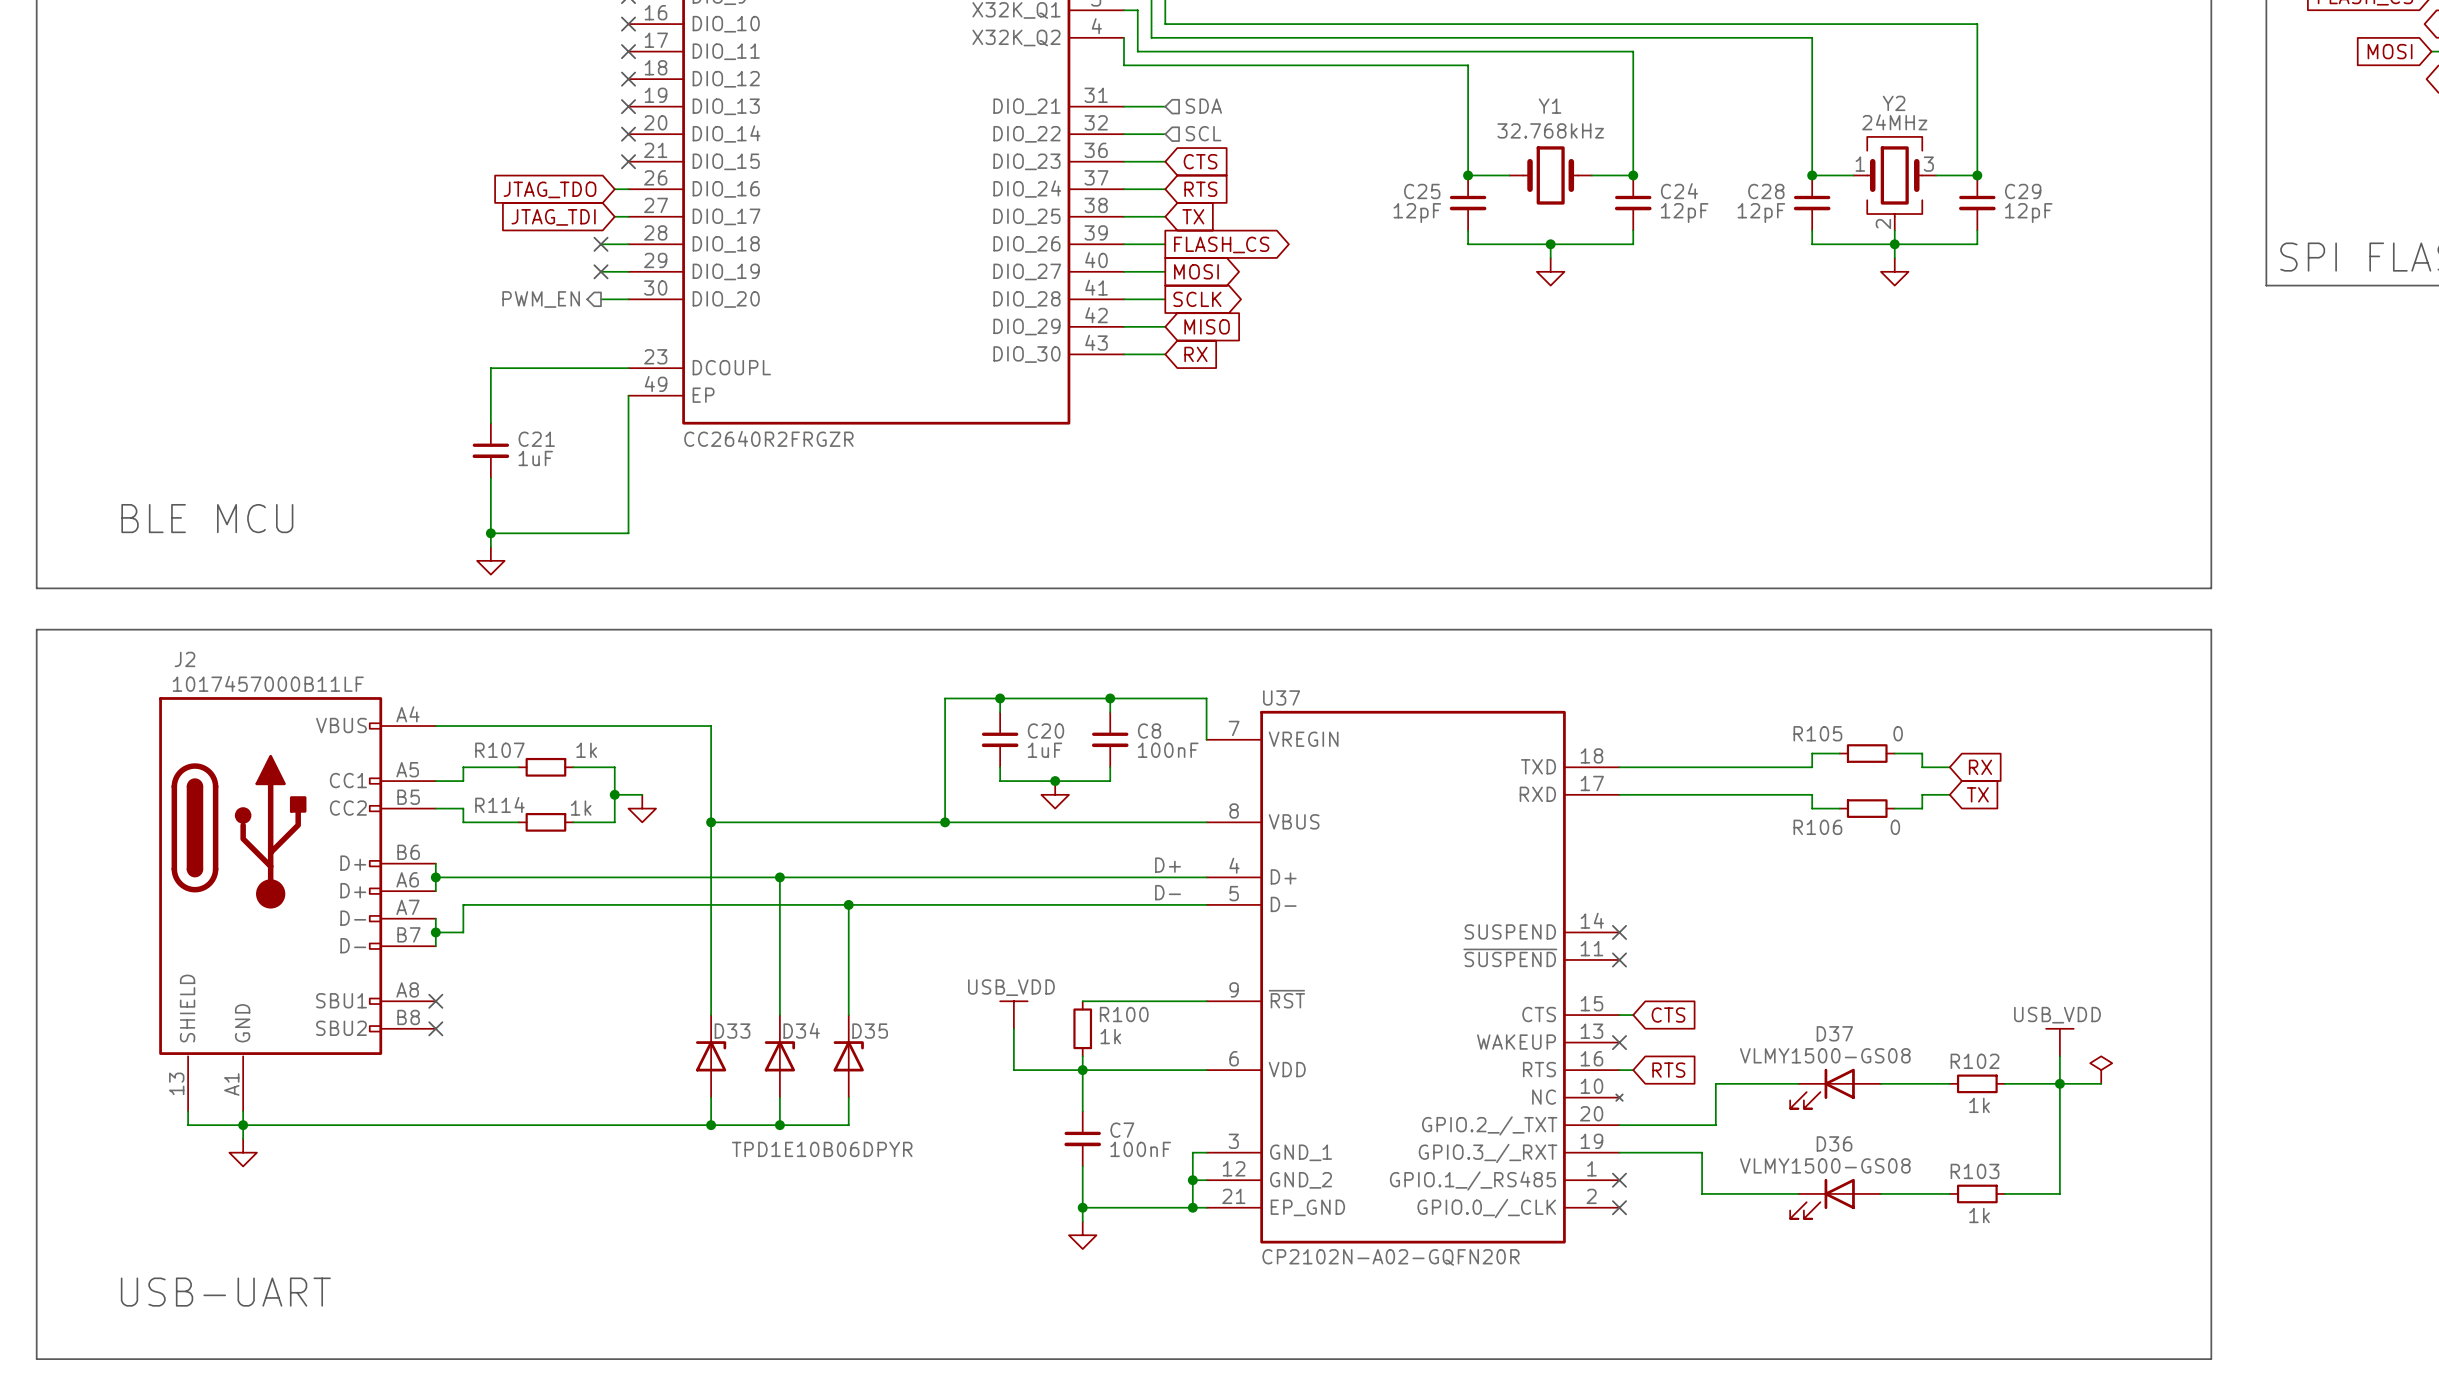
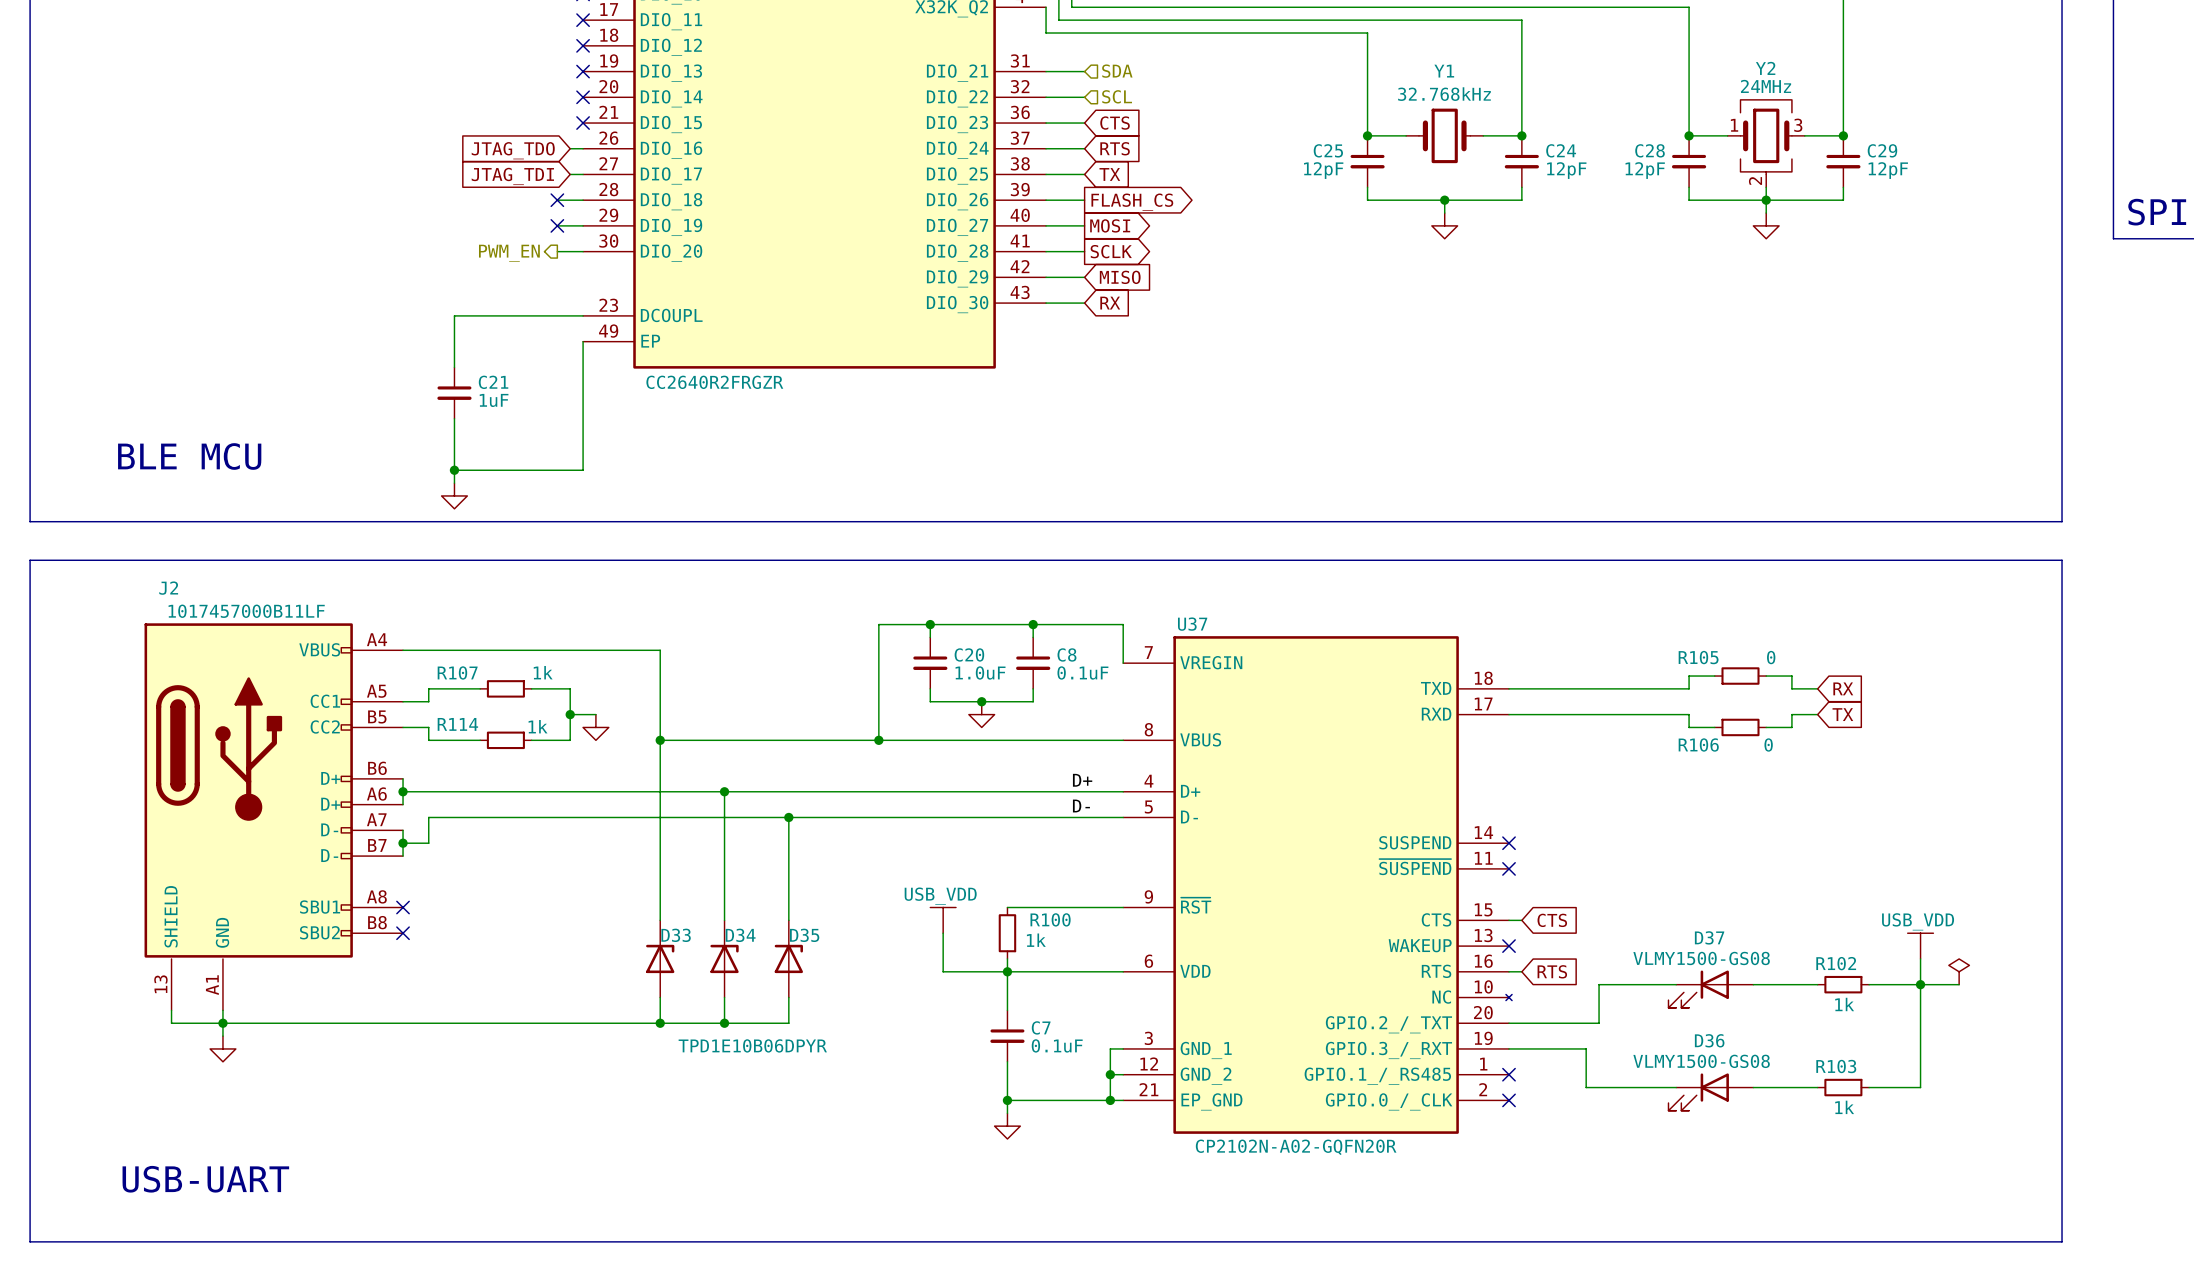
C20 value: 1uF (1045, 750) -> 1.0uF (980, 672)
C8 value: 100nF (1168, 750) -> 0.1uF (1082, 672)
C7 value: 100nF (1140, 1149) -> 0.1uF (1057, 1045)

